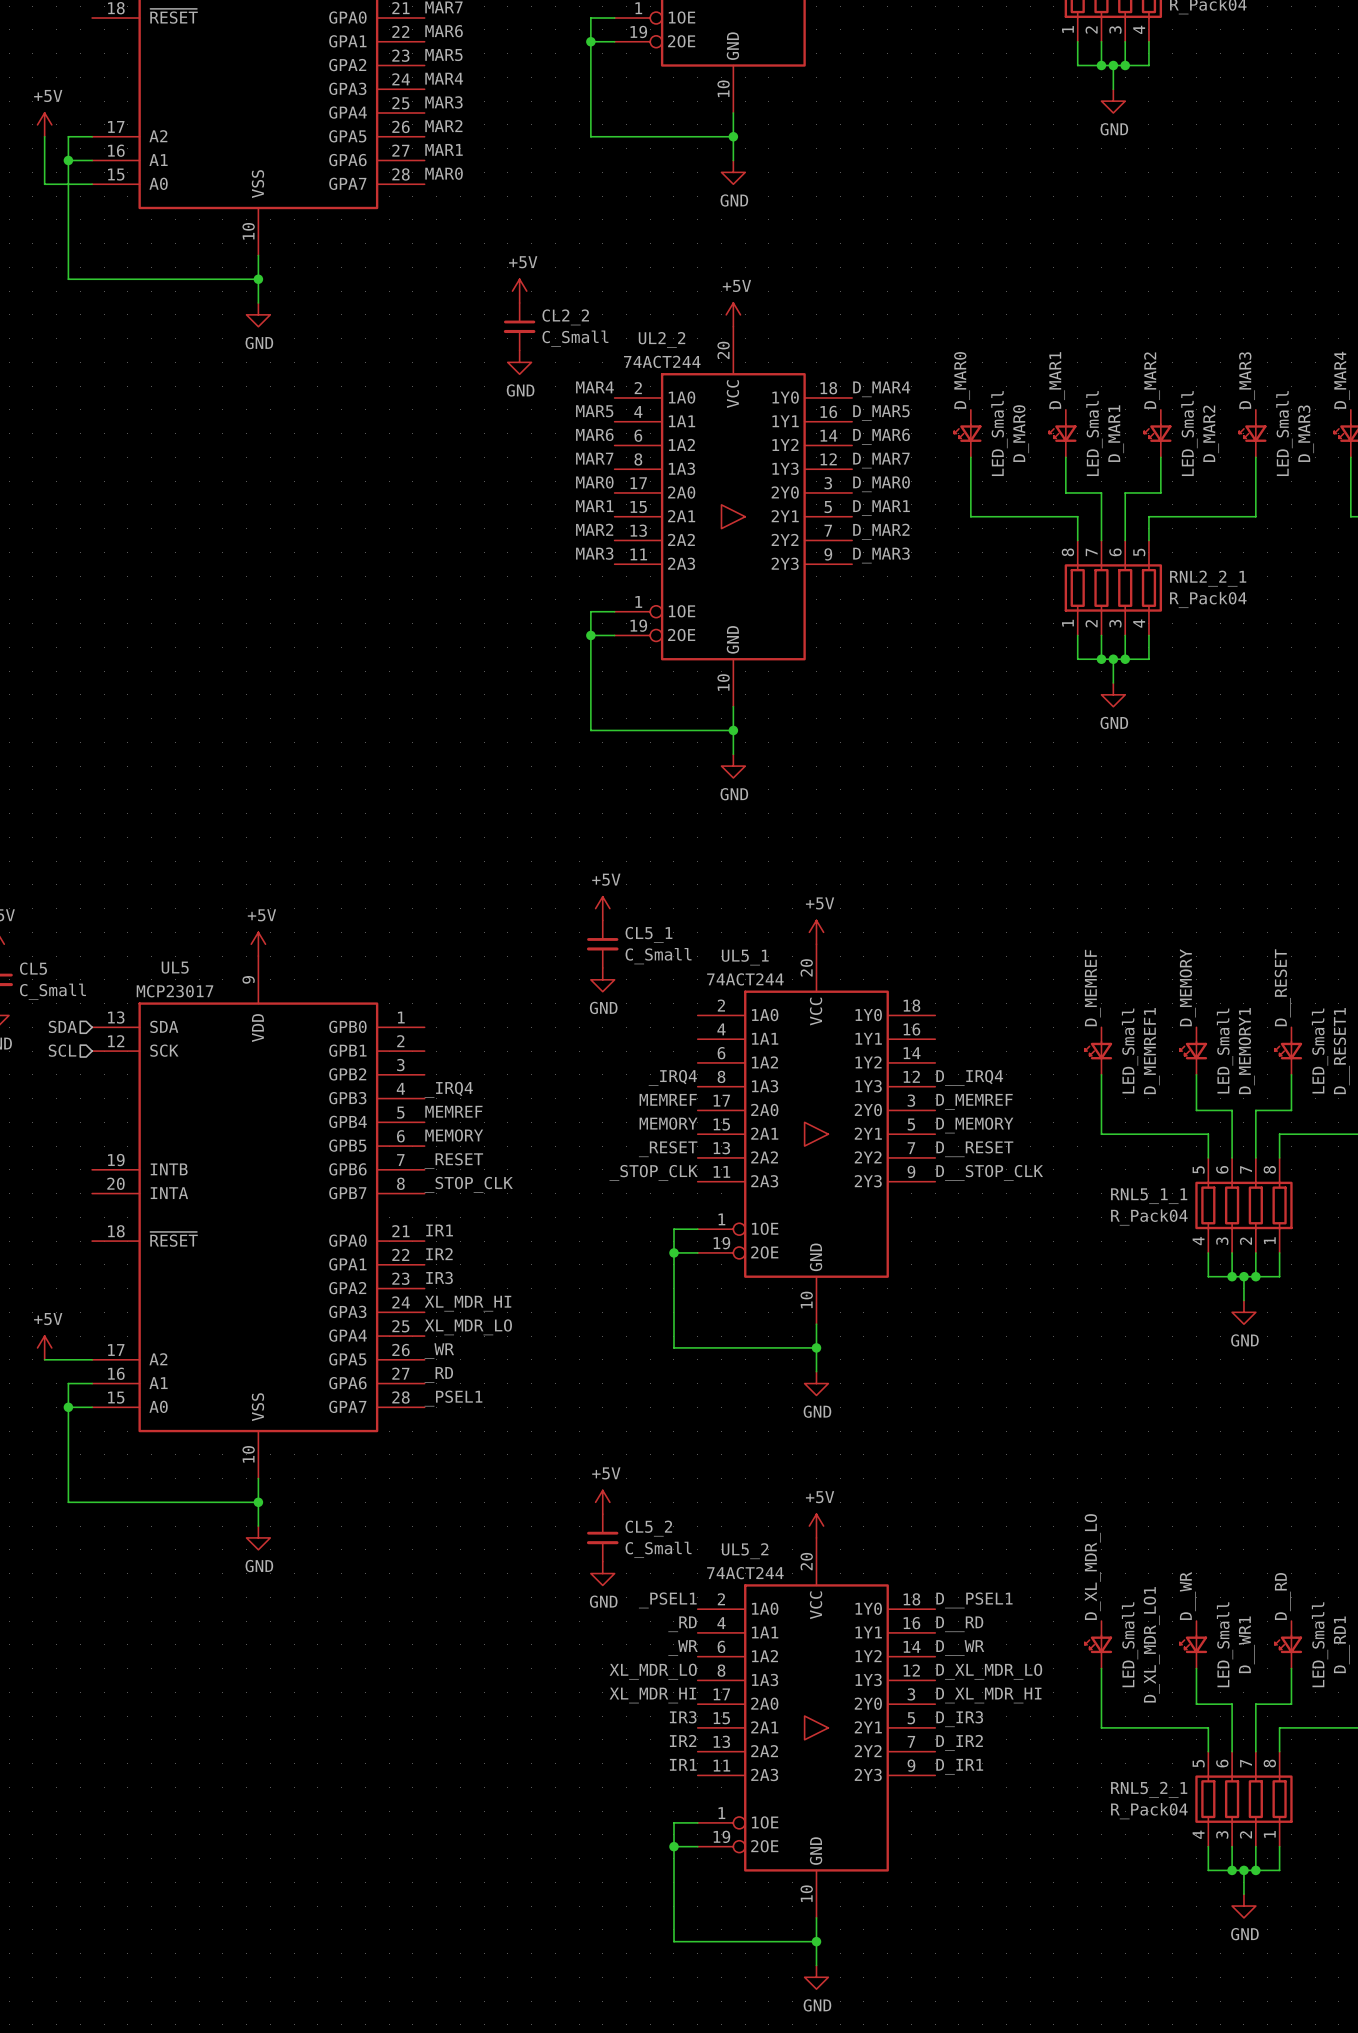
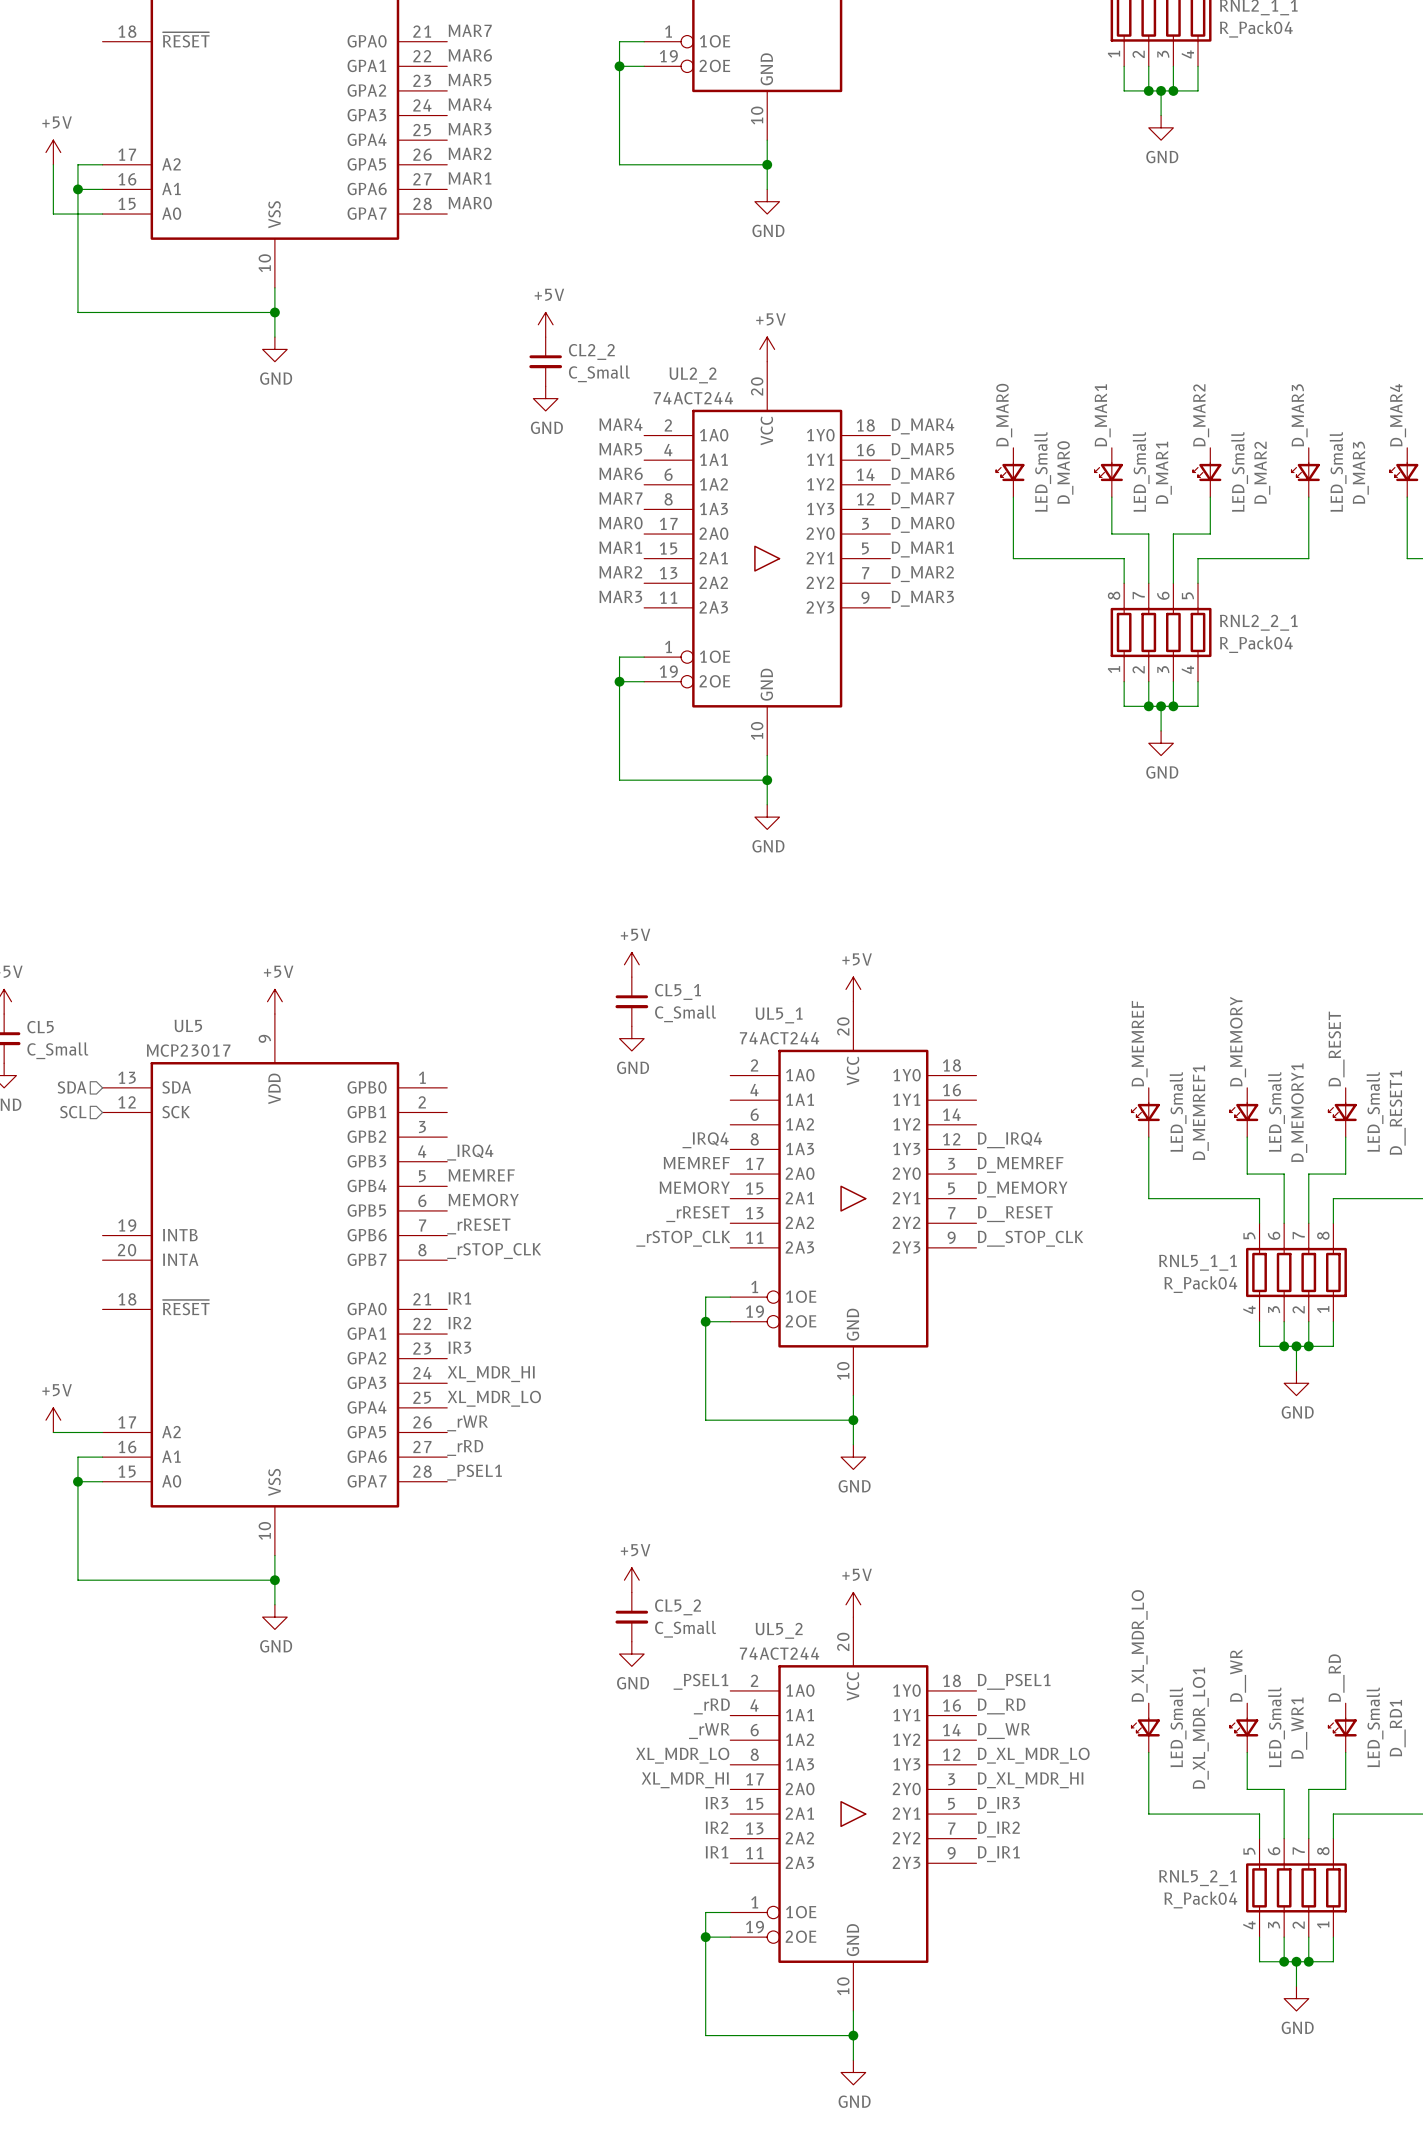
label: _RESET (668, 1149) -> _rRESET (697, 1214)
label: _RESET (453, 1161) -> _rRESET (478, 1226)
label: _STOP_CLK (653, 1172) -> _rSTOP_CLK (683, 1238)
label: _STOP_CLK (468, 1184) -> _rSTOP_CLK (494, 1251)
label: _WR (439, 1351) -> _rWR (467, 1423)
label: _RD (438, 1374) -> _rRD (465, 1448)
label: _RD (682, 1624) -> _rRD (711, 1706)
label: _WR (683, 1648) -> _rWR (709, 1731)

